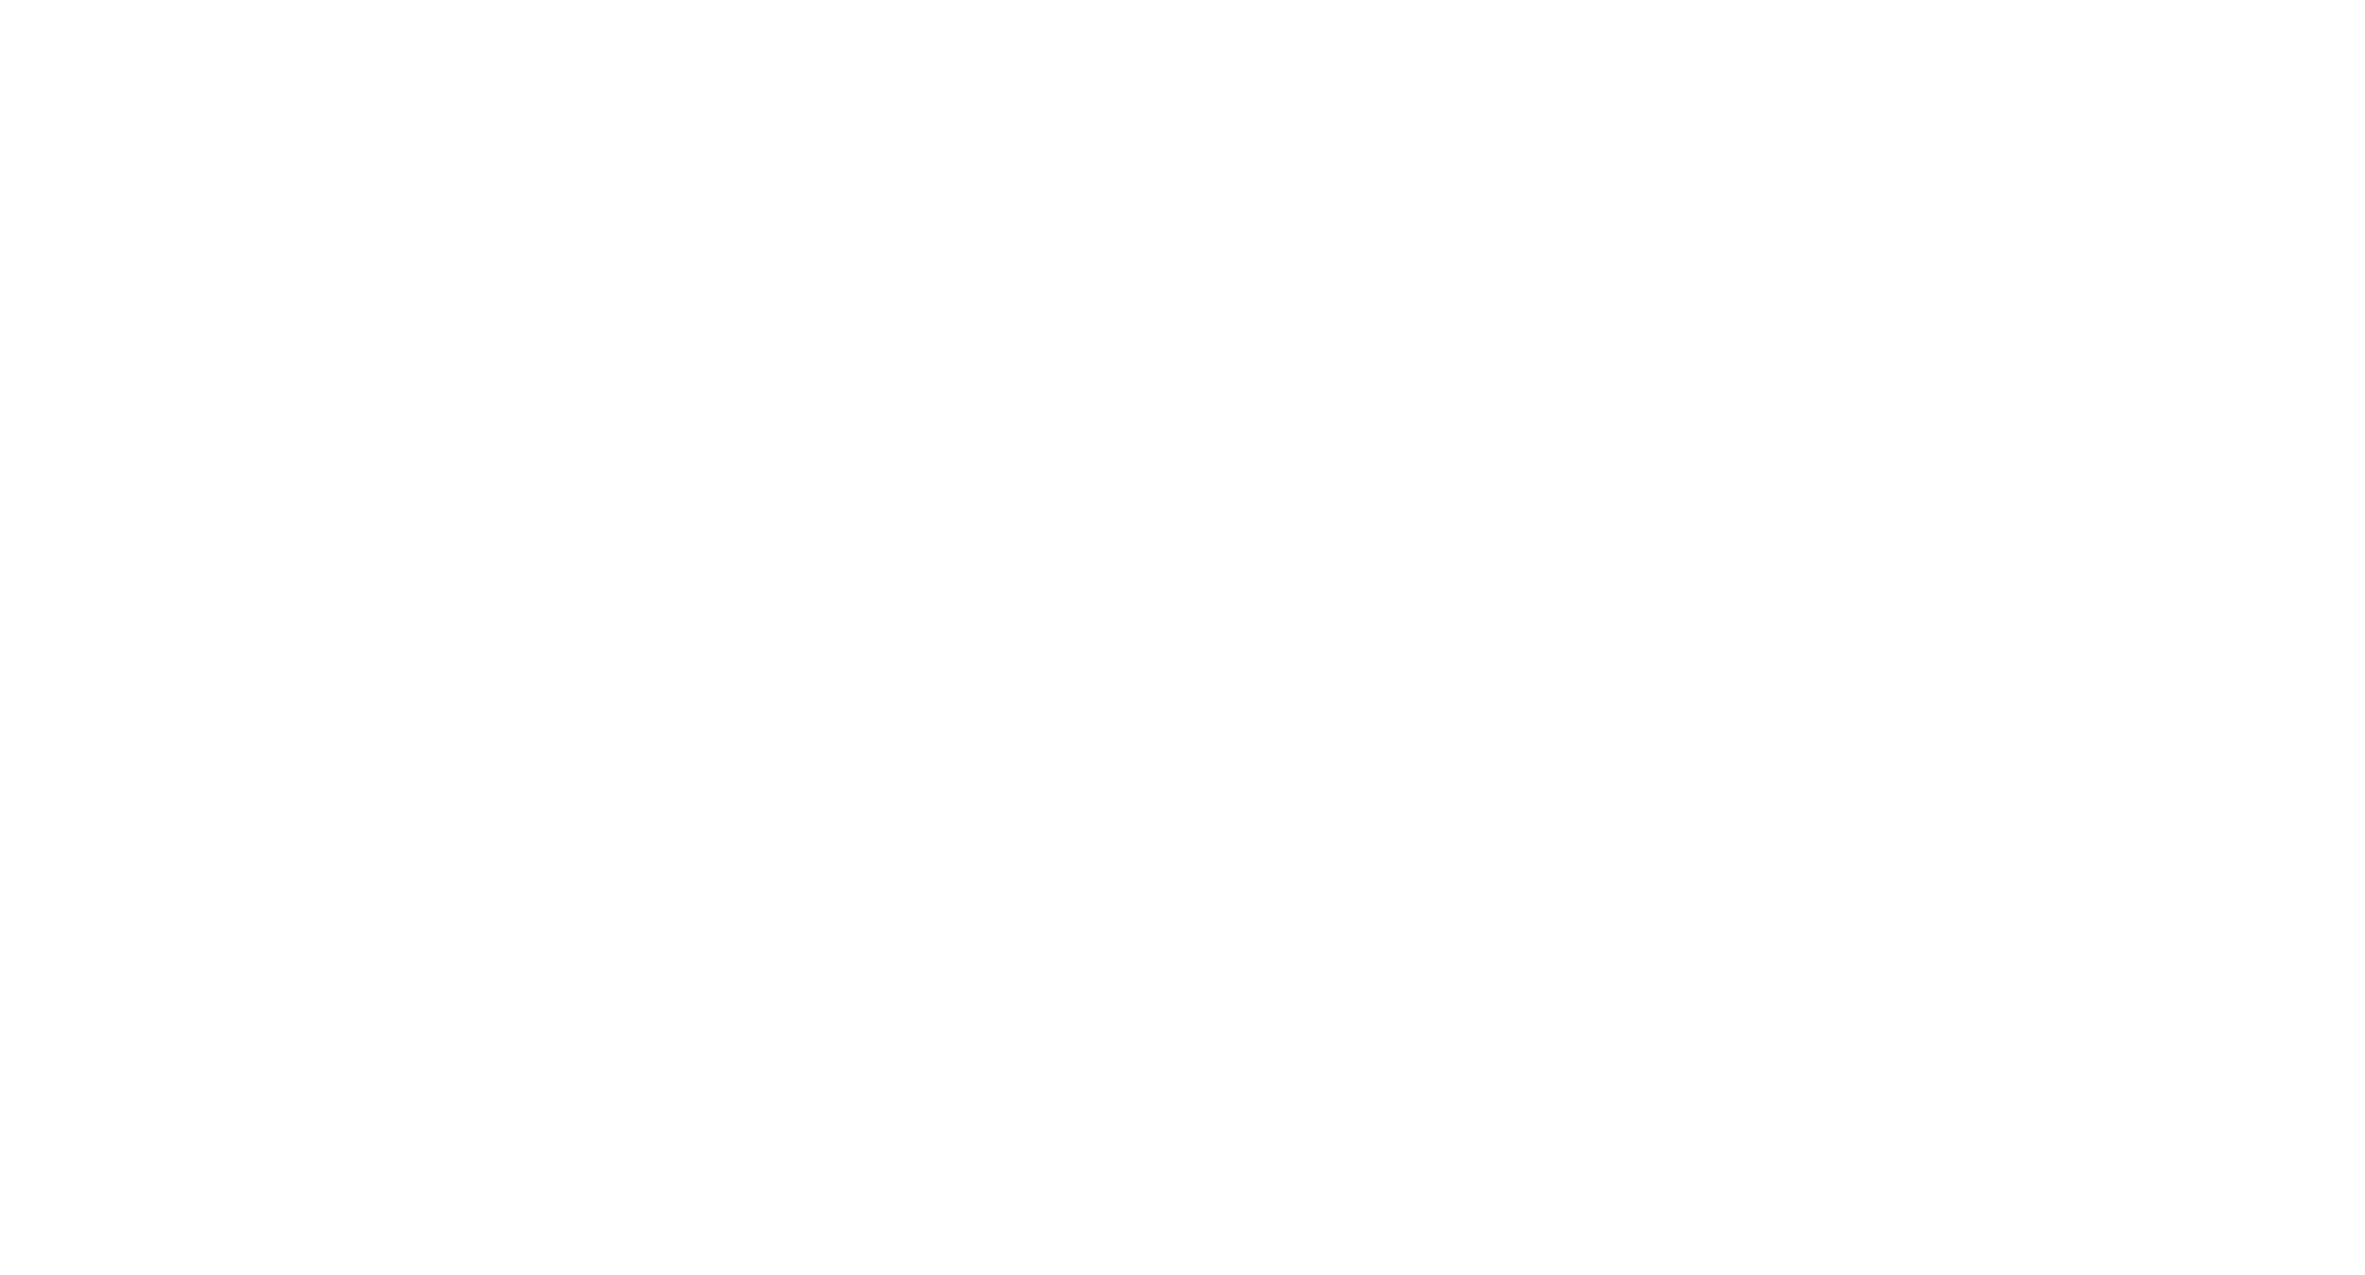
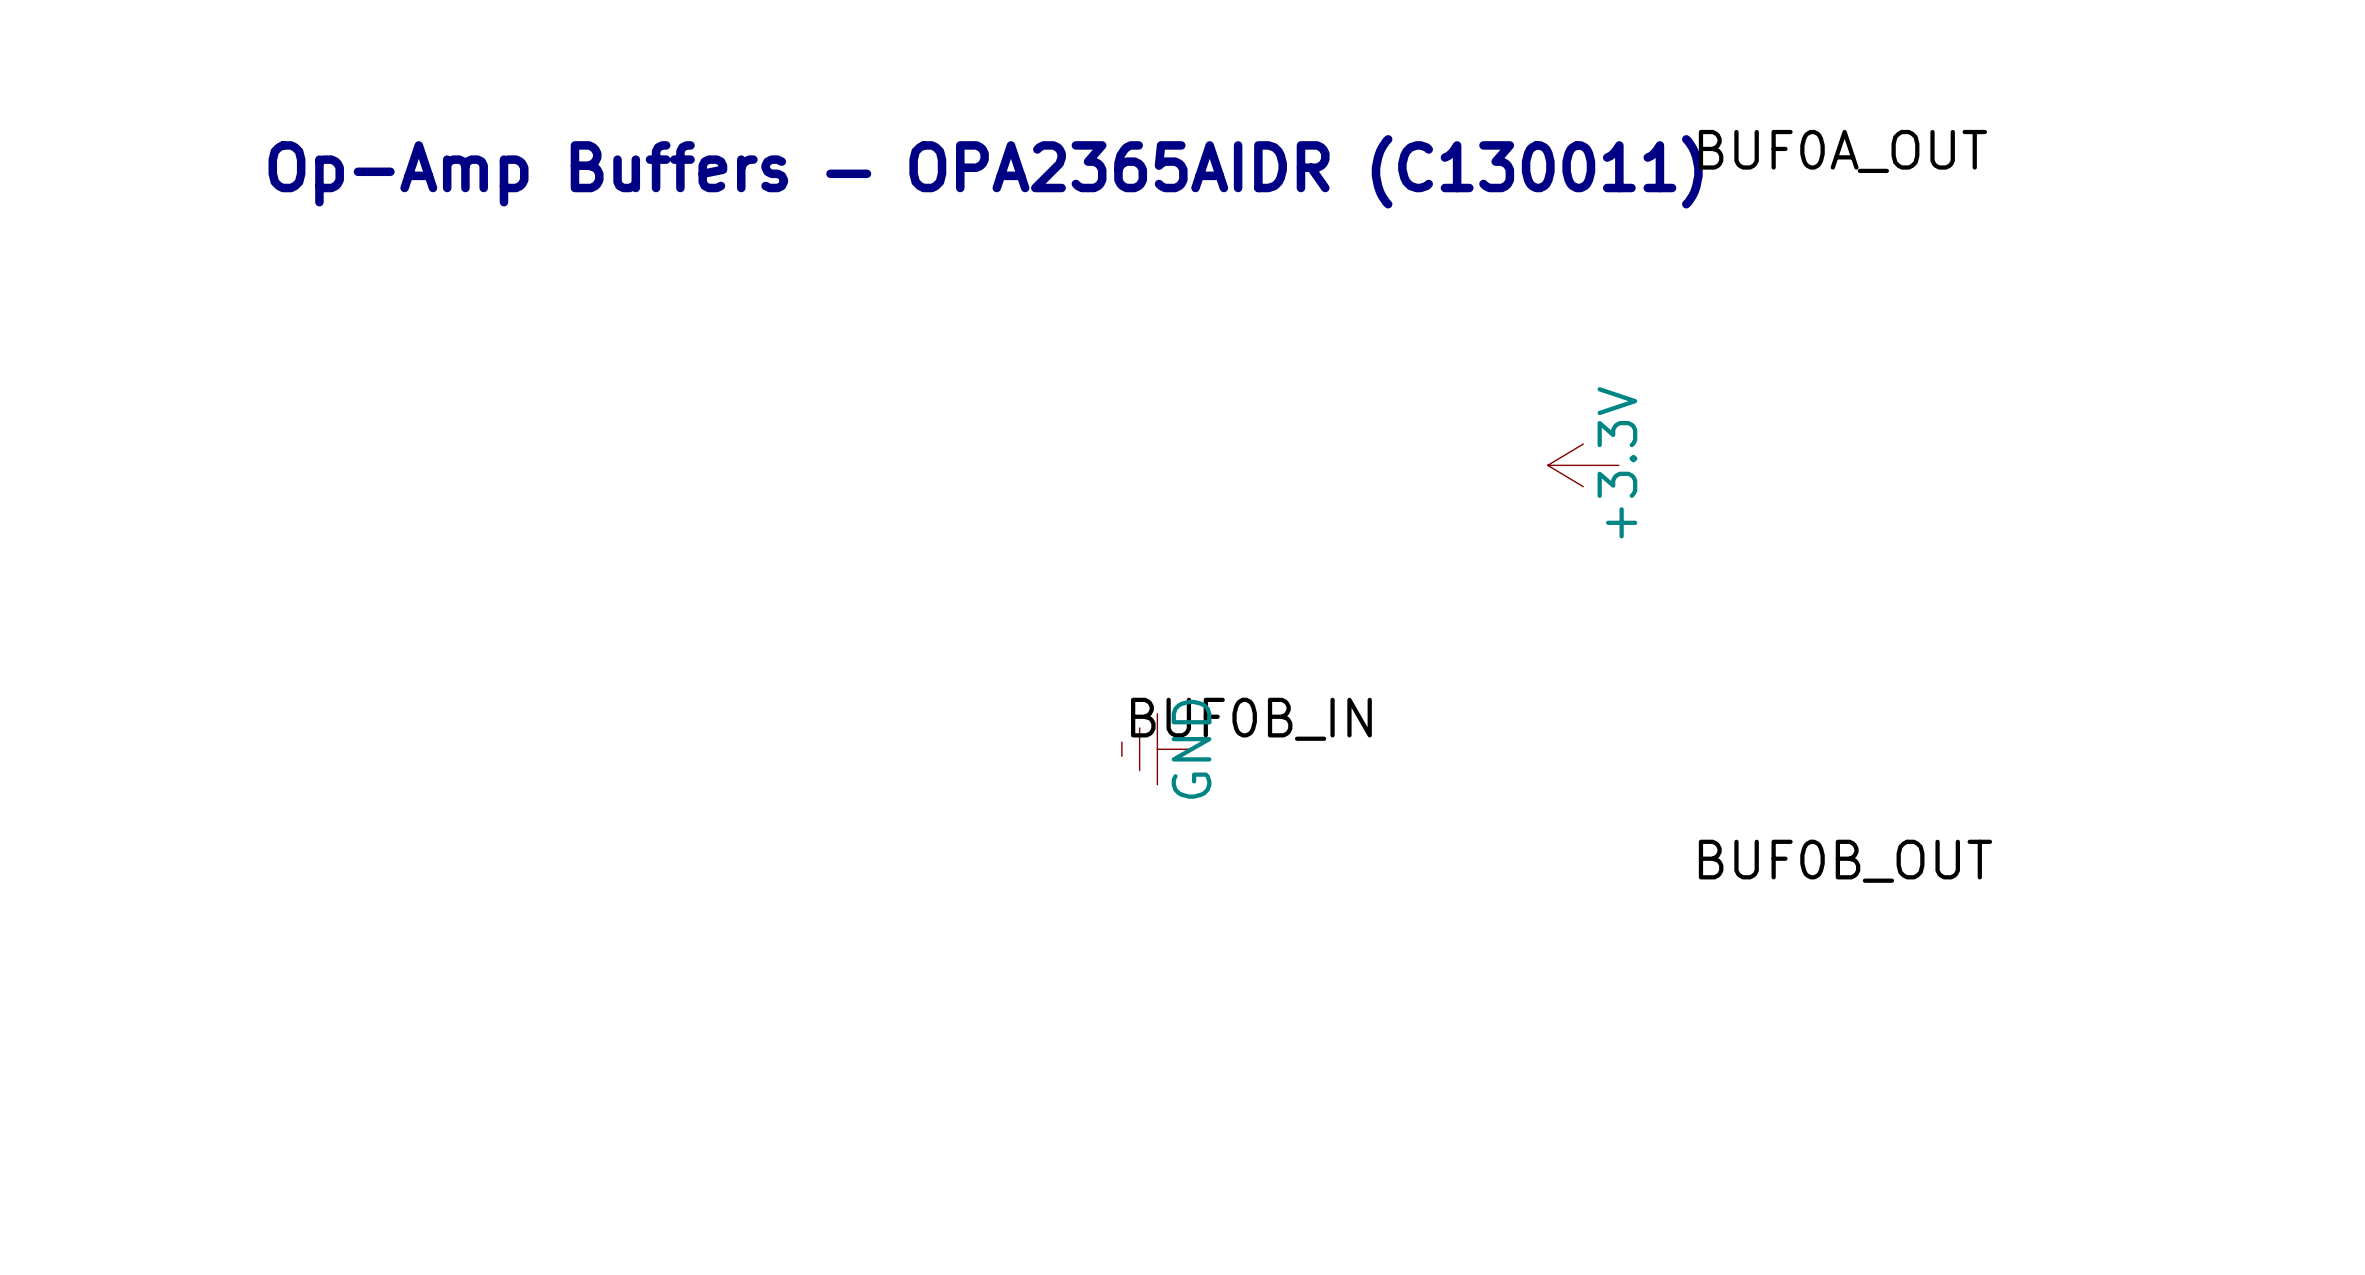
label: none -> BUF0A_OUT (1842, 151)
text: none -> Op-Amp Buffers — OPA2365AIDR (C130011) (985, 171)
power symbol: none -> +3.3V (1583, 465)
label: none -> BUF0B_IN (1251, 719)
power symbol: none -> GND (1157, 749)
label: none -> BUF0B_OUT (1845, 861)

